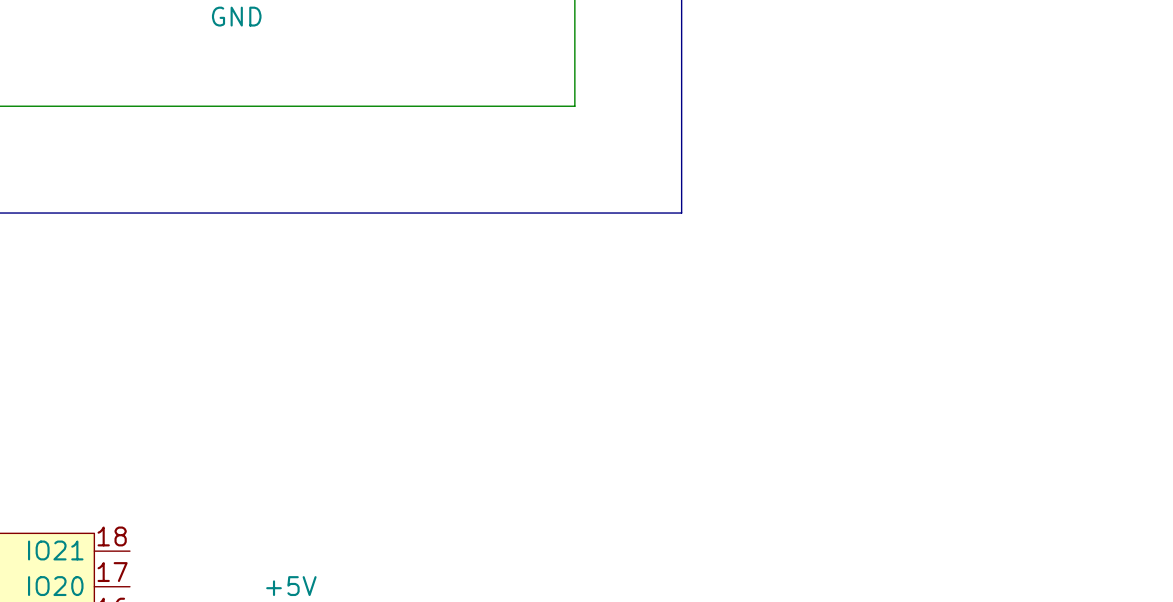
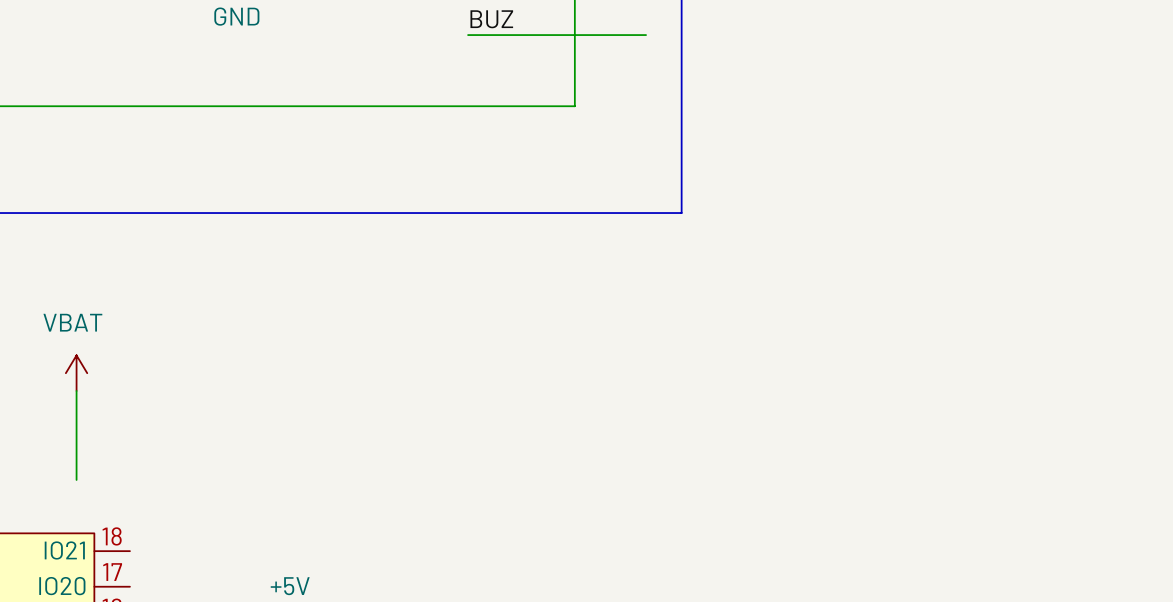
label: none -> BUZ (491, 19)
wire: none -> (468, 35) (646, 35)
power symbol: none -> VBAT (76, 373)
wire: none -> (76, 390) (76, 479)

